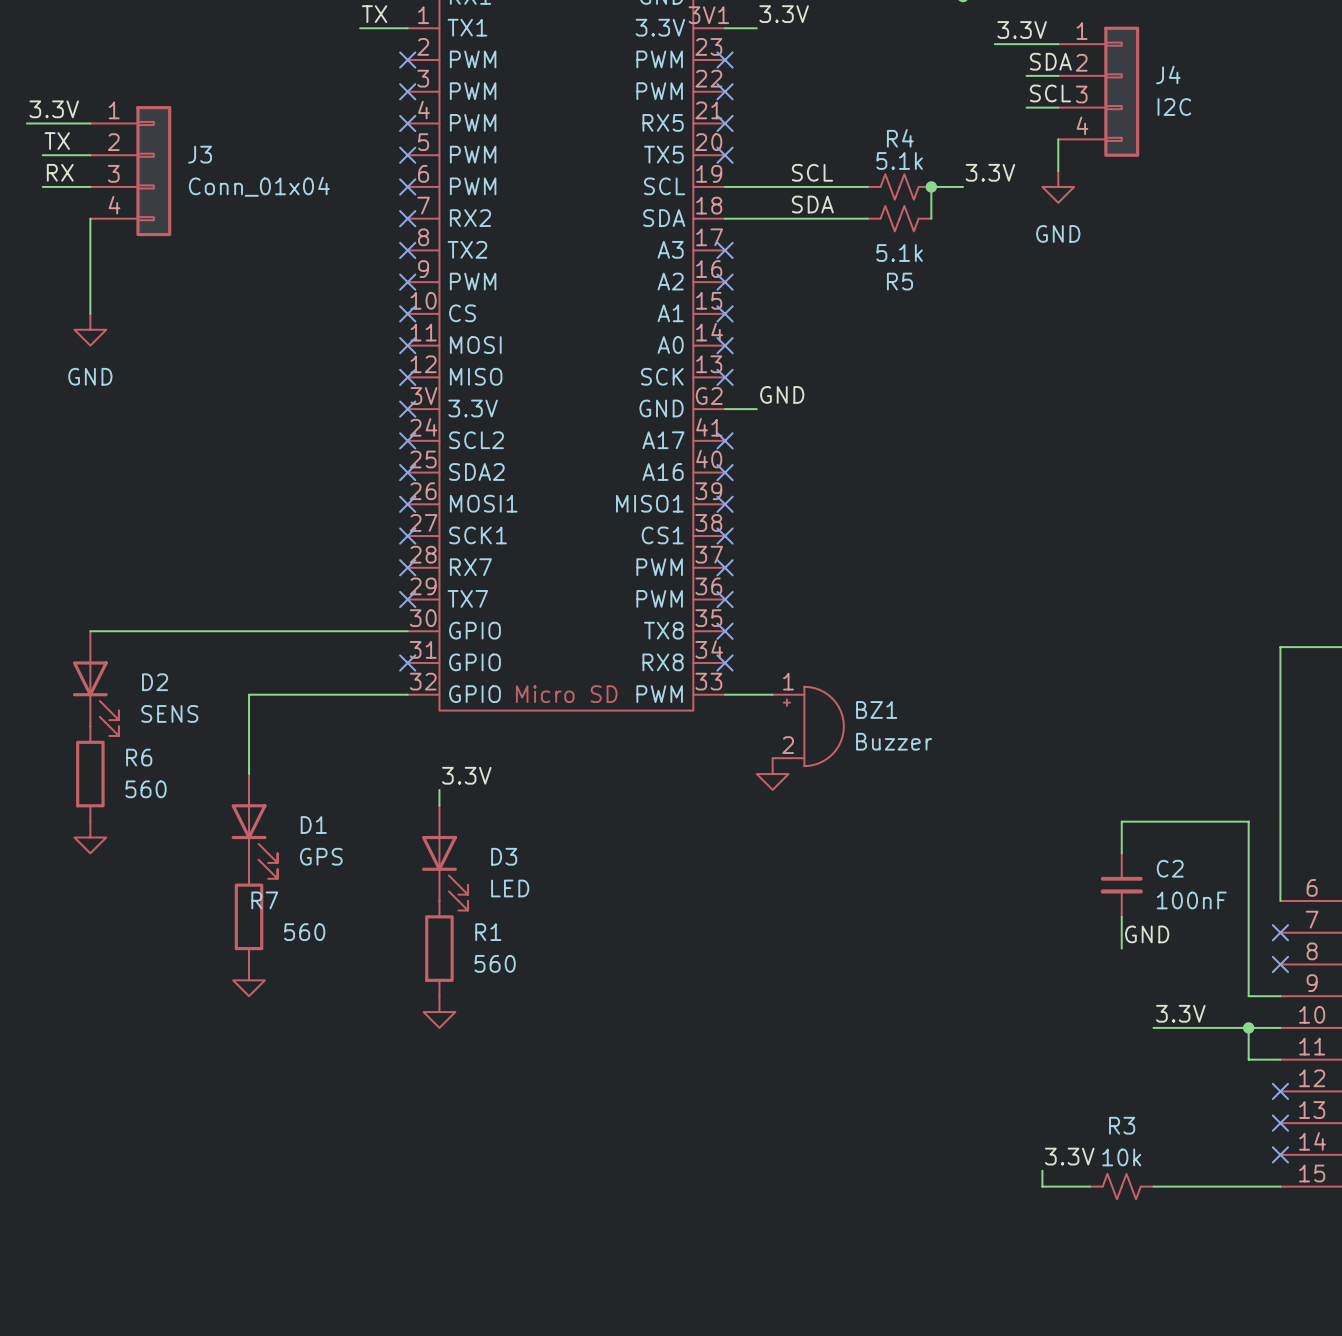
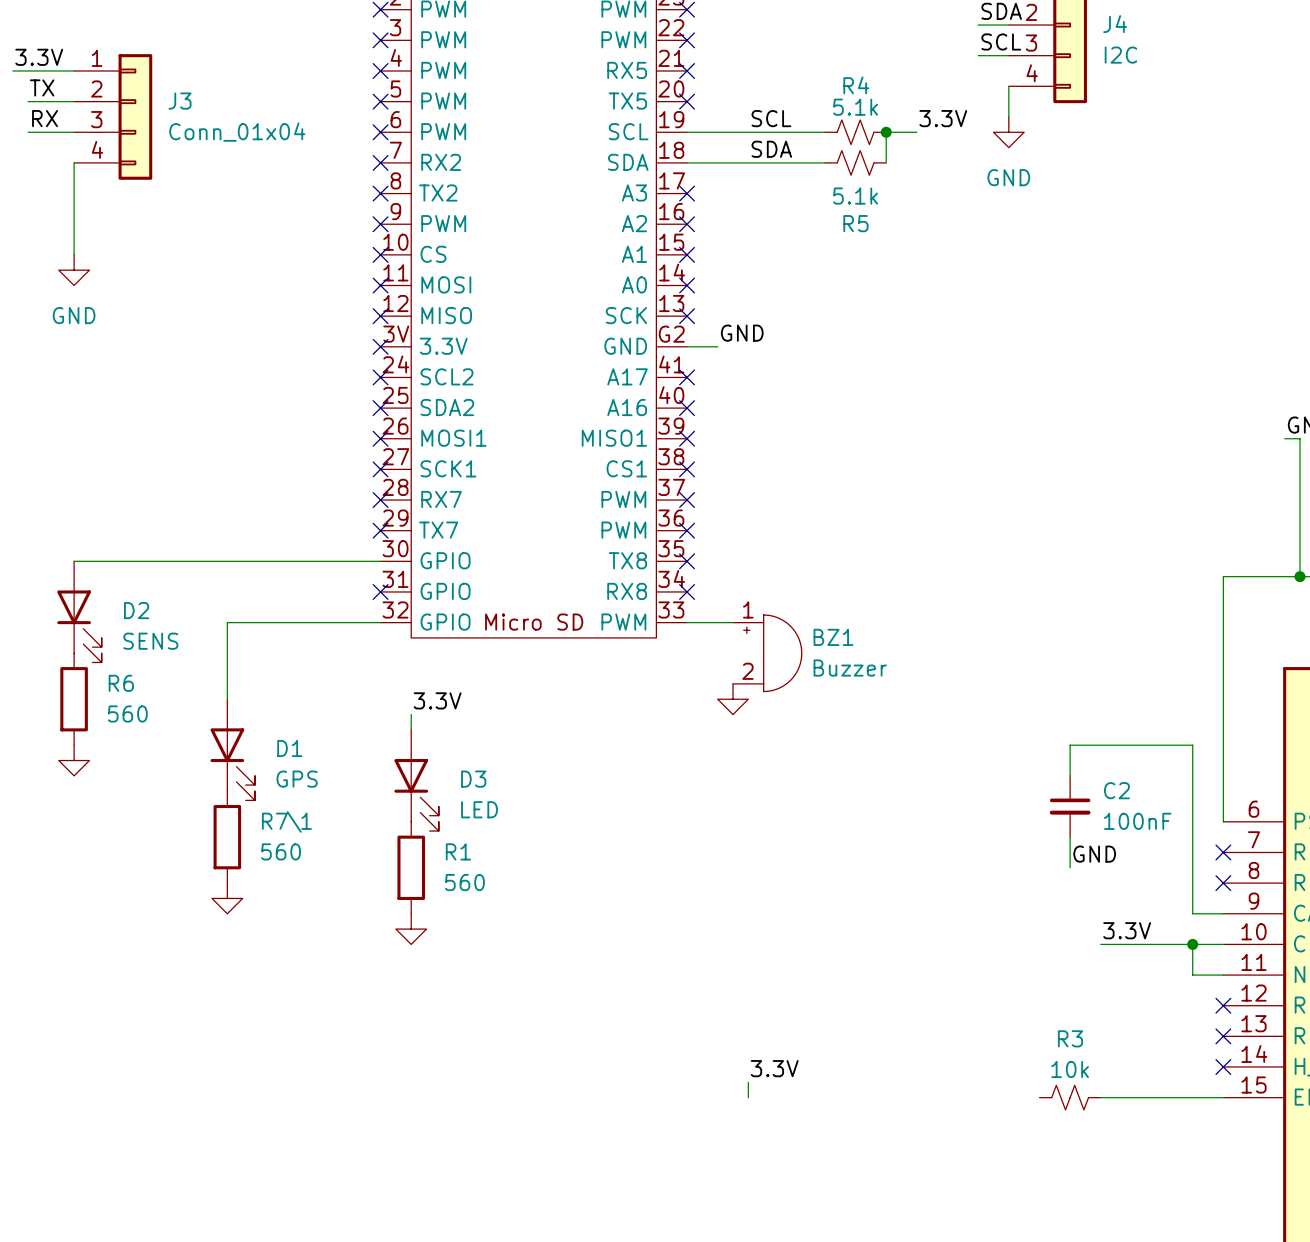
R7 name: R7 (264, 900) -> R7\1 (286, 821)
label position: 3.3V (1069, 1156) -> 3.3V (774, 1068)
wire: none -> (748, 1082) (748, 1097)
wire: (1042, 1170) (1042, 1186) (1090, 1186) -> none

